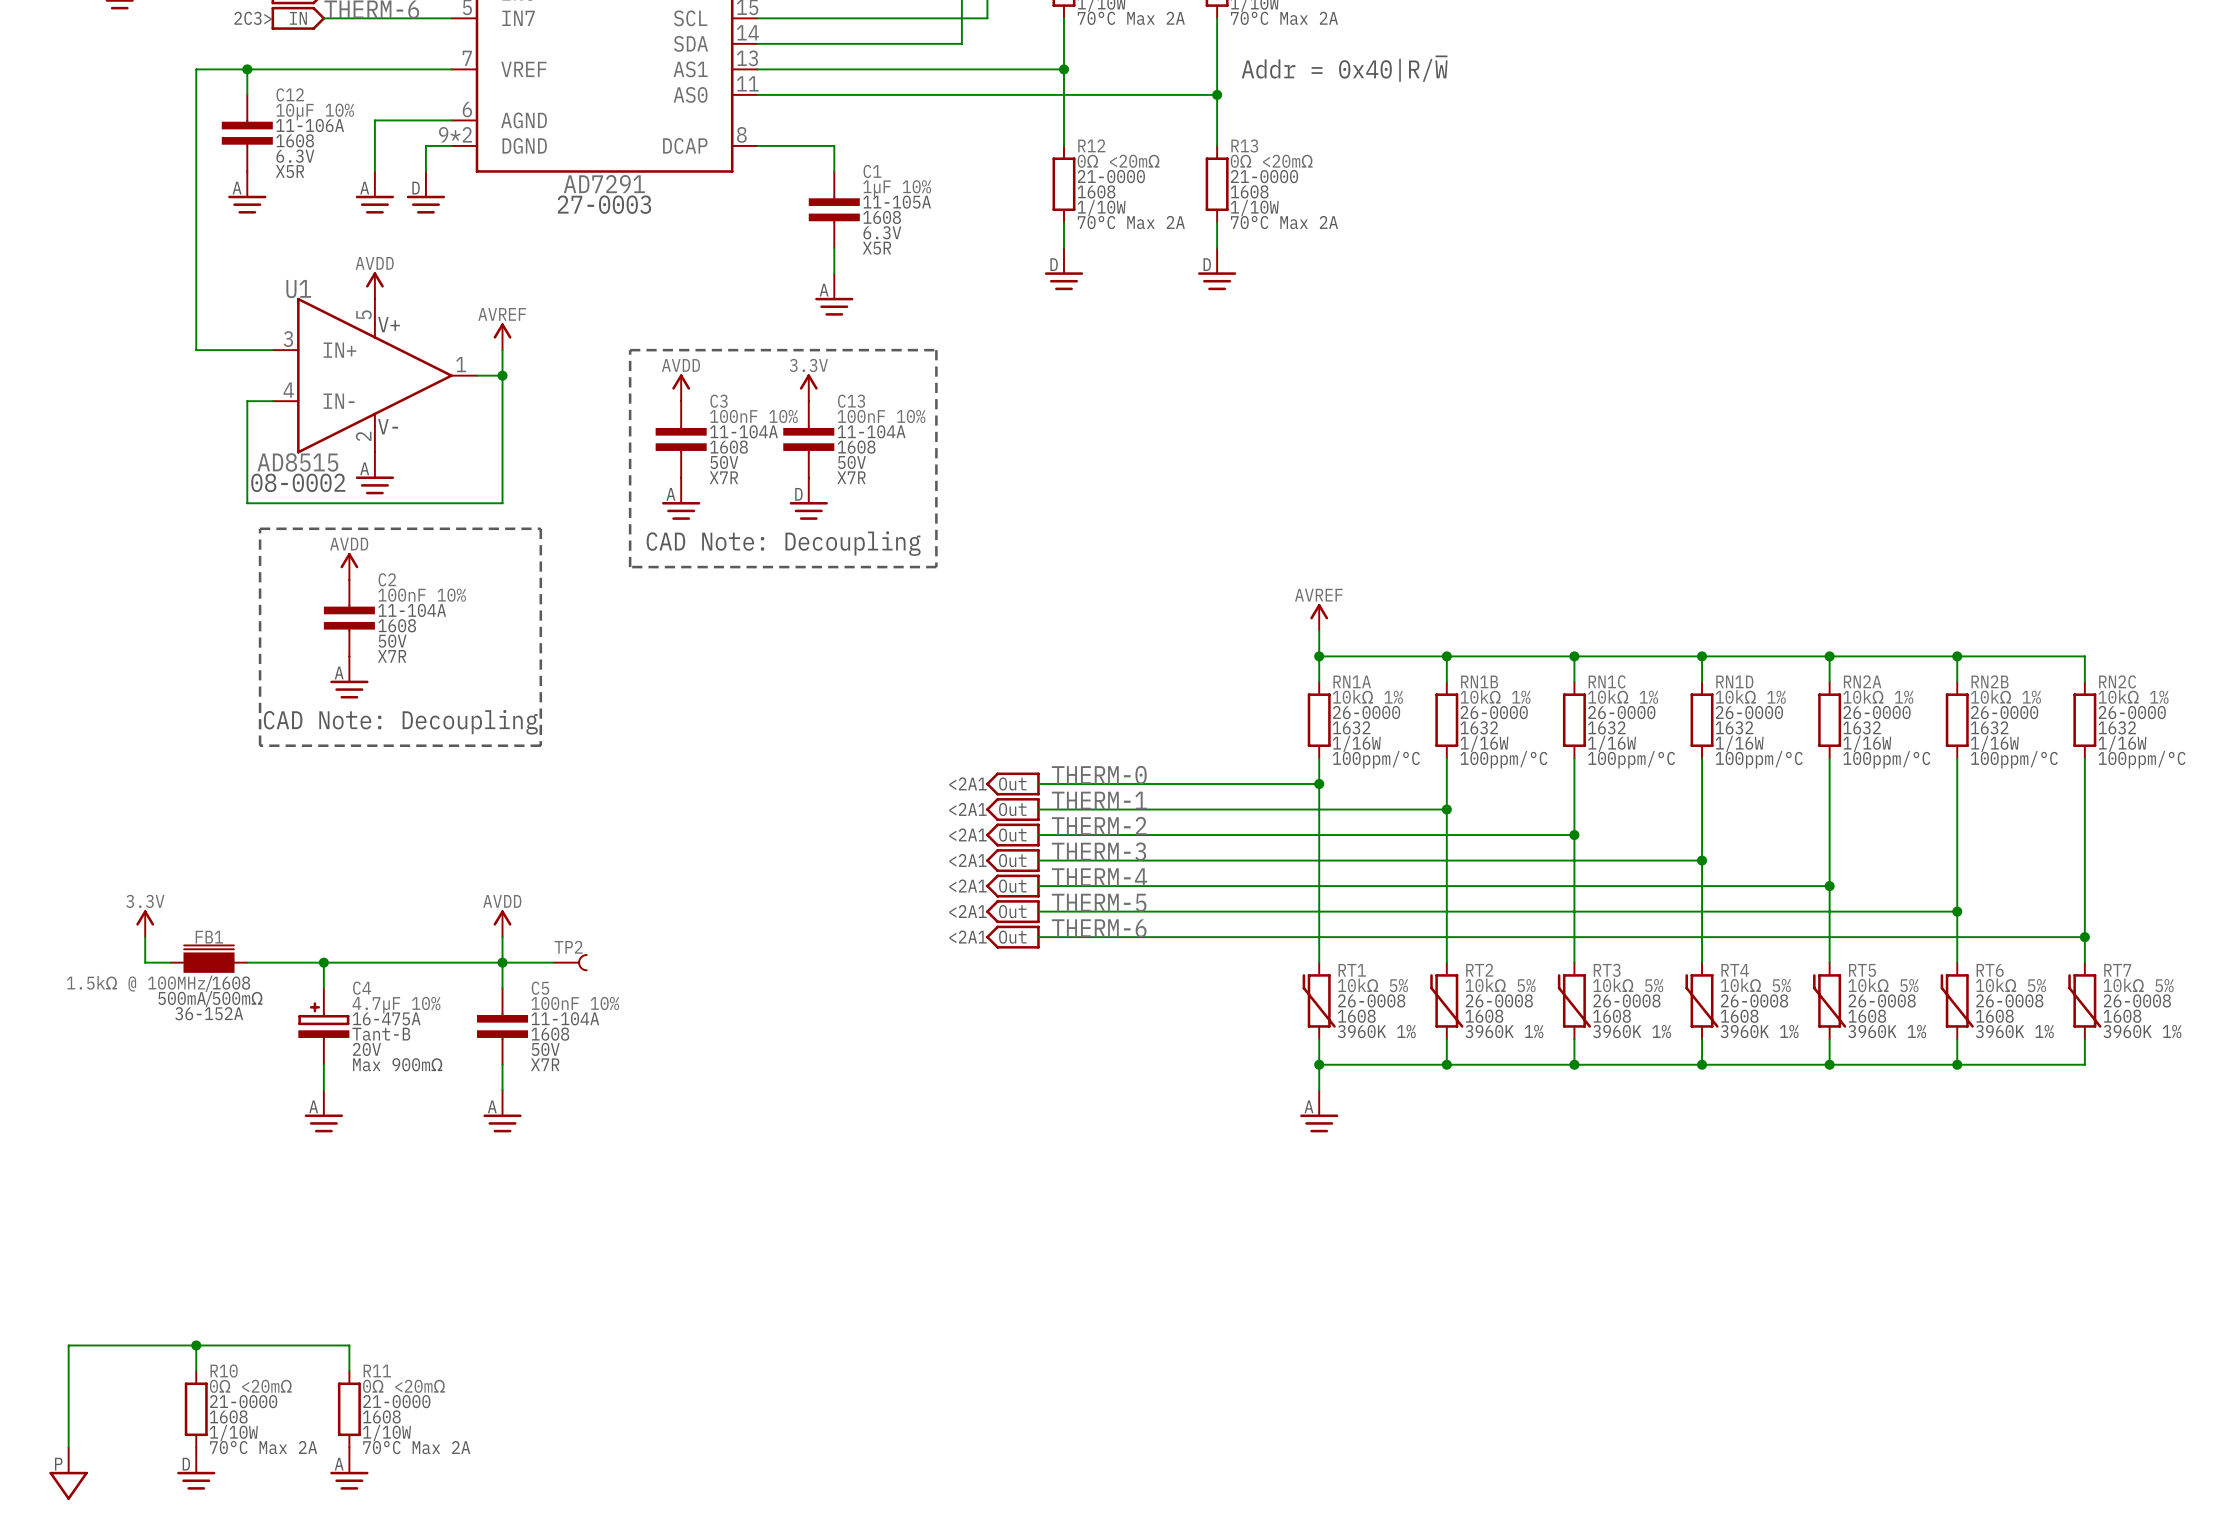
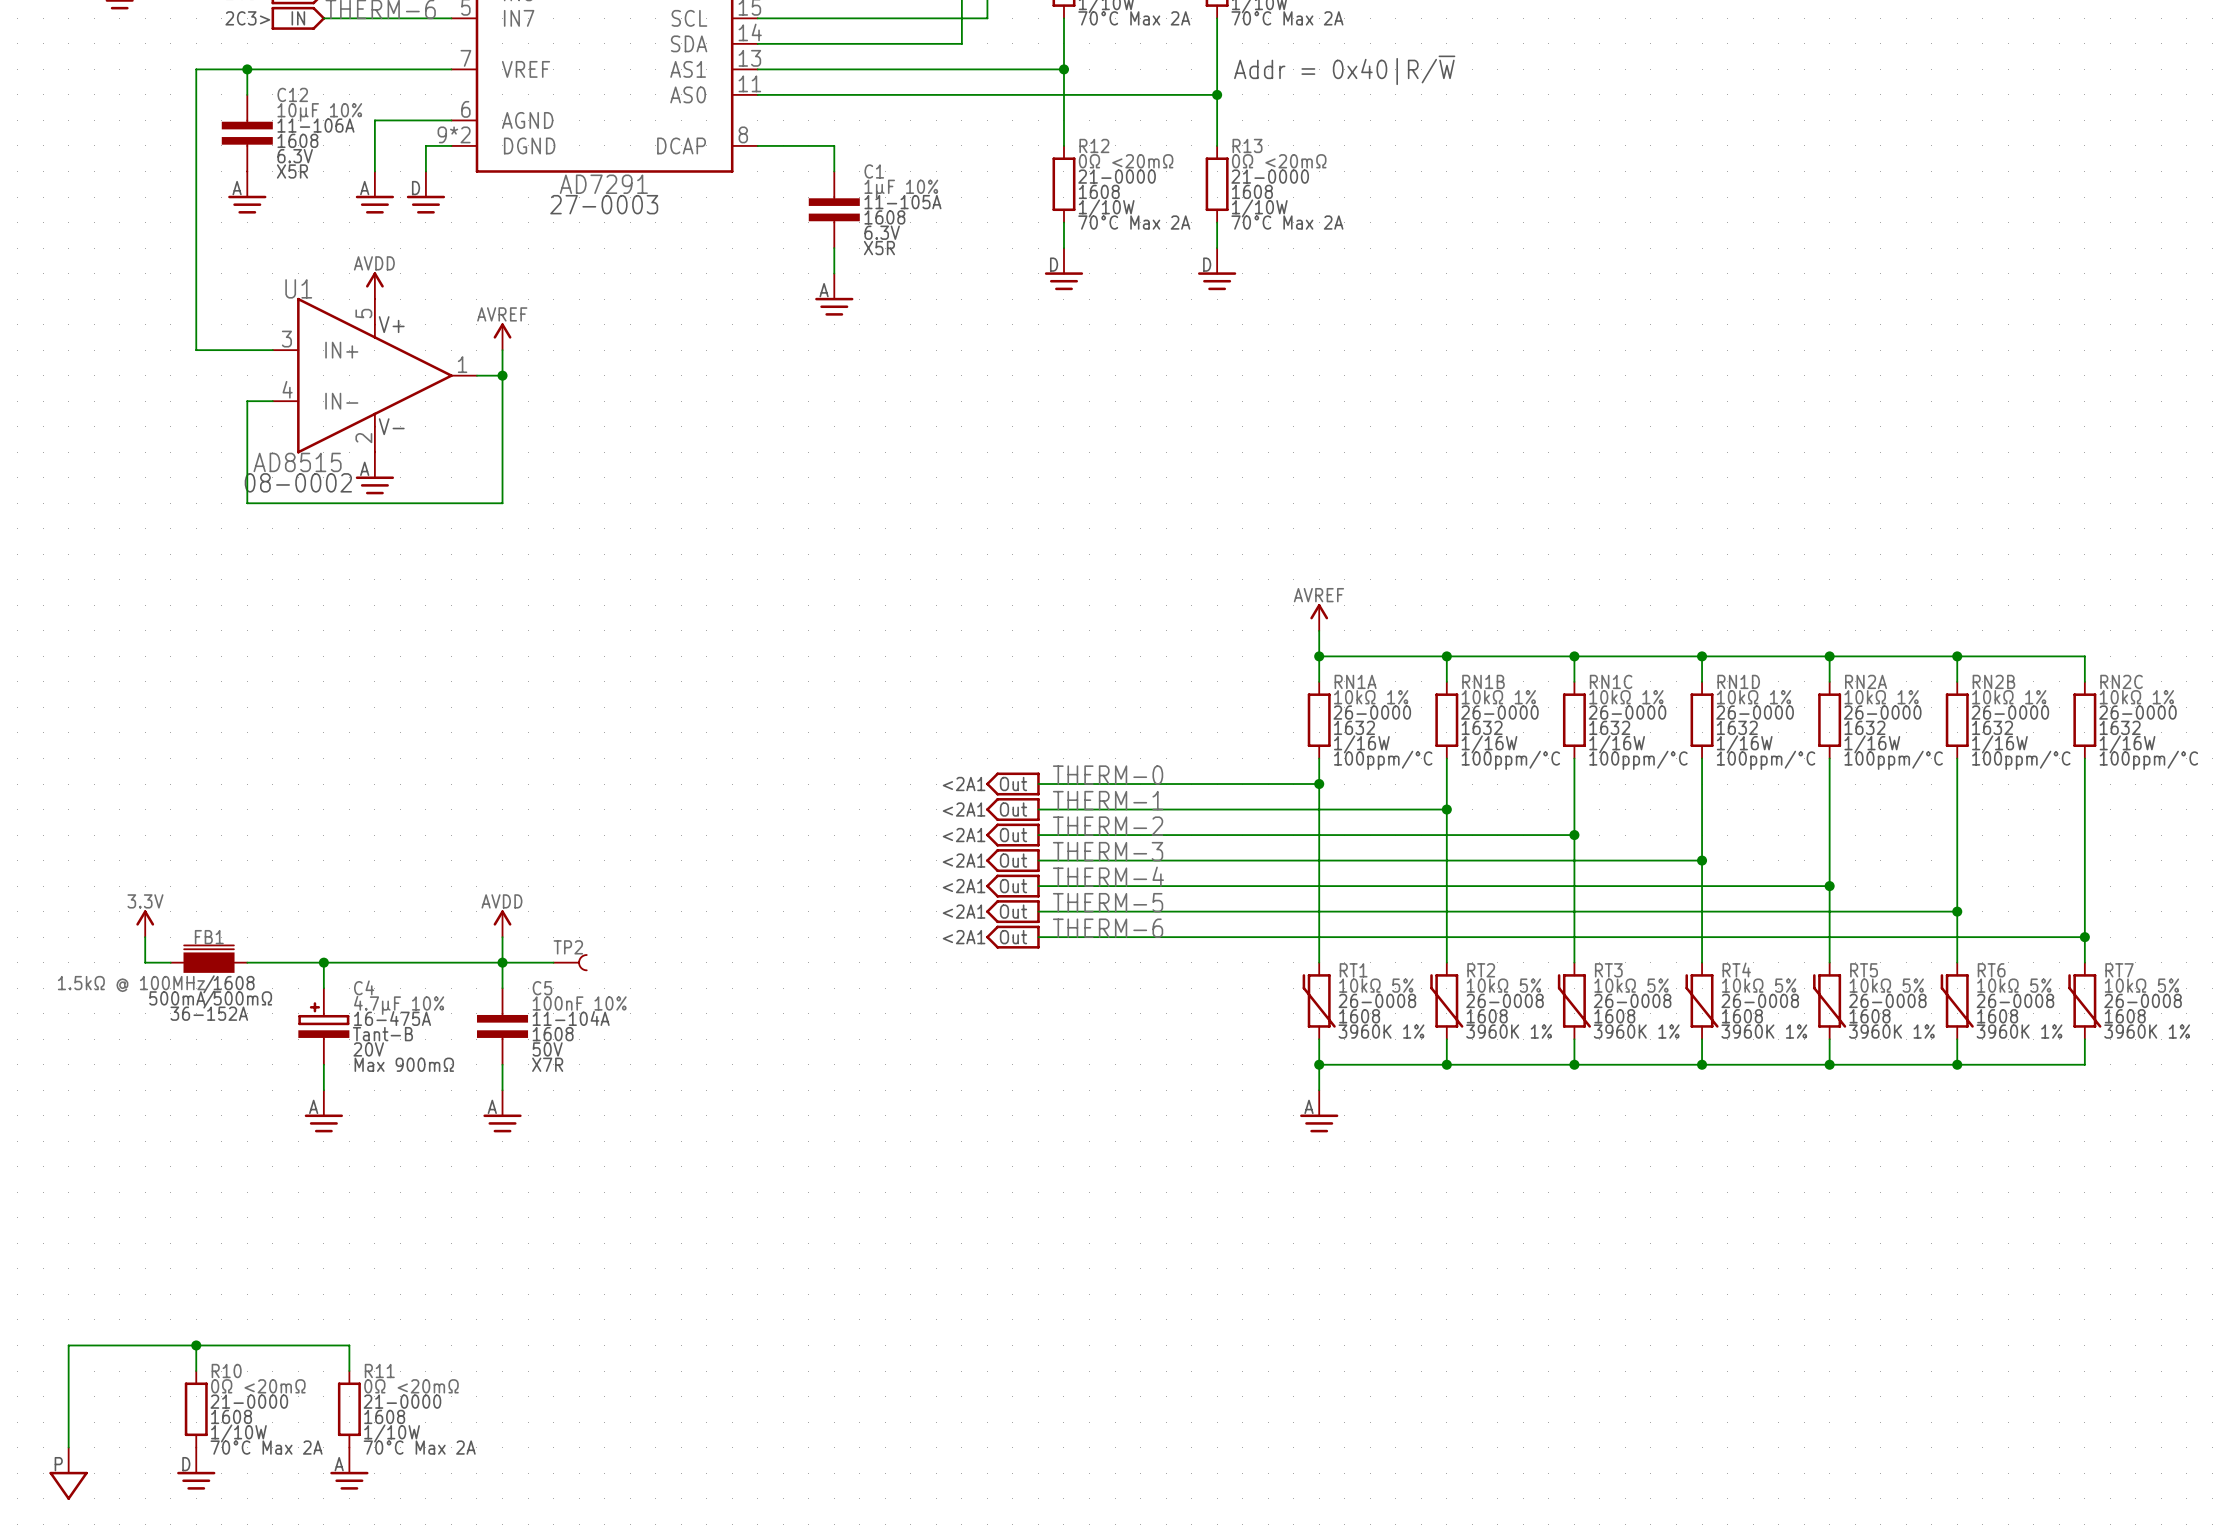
line: (630, 350) (936, 350) (936, 567) (630, 567) (630, 350) -> none
power symbol: AVDD (681, 387) -> none
power symbol: 3.3V (808, 387) -> none
C3: 100nF 10% (681, 439) -> none
C13: 100nF 10% (808, 439) -> none
power symbol: (681, 498) -> none
power symbol: (808, 498) -> none
line: (260, 528) (540, 528) (540, 745) (260, 745) (260, 528) -> none
text: CAD Note: Decoupling (783, 543) -> none
power symbol: AVDD (349, 566) -> none
C2: 100nF 10% (349, 618) -> none
power symbol: (349, 677) -> none
text: CAD Note: Decoupling (400, 722) -> none

